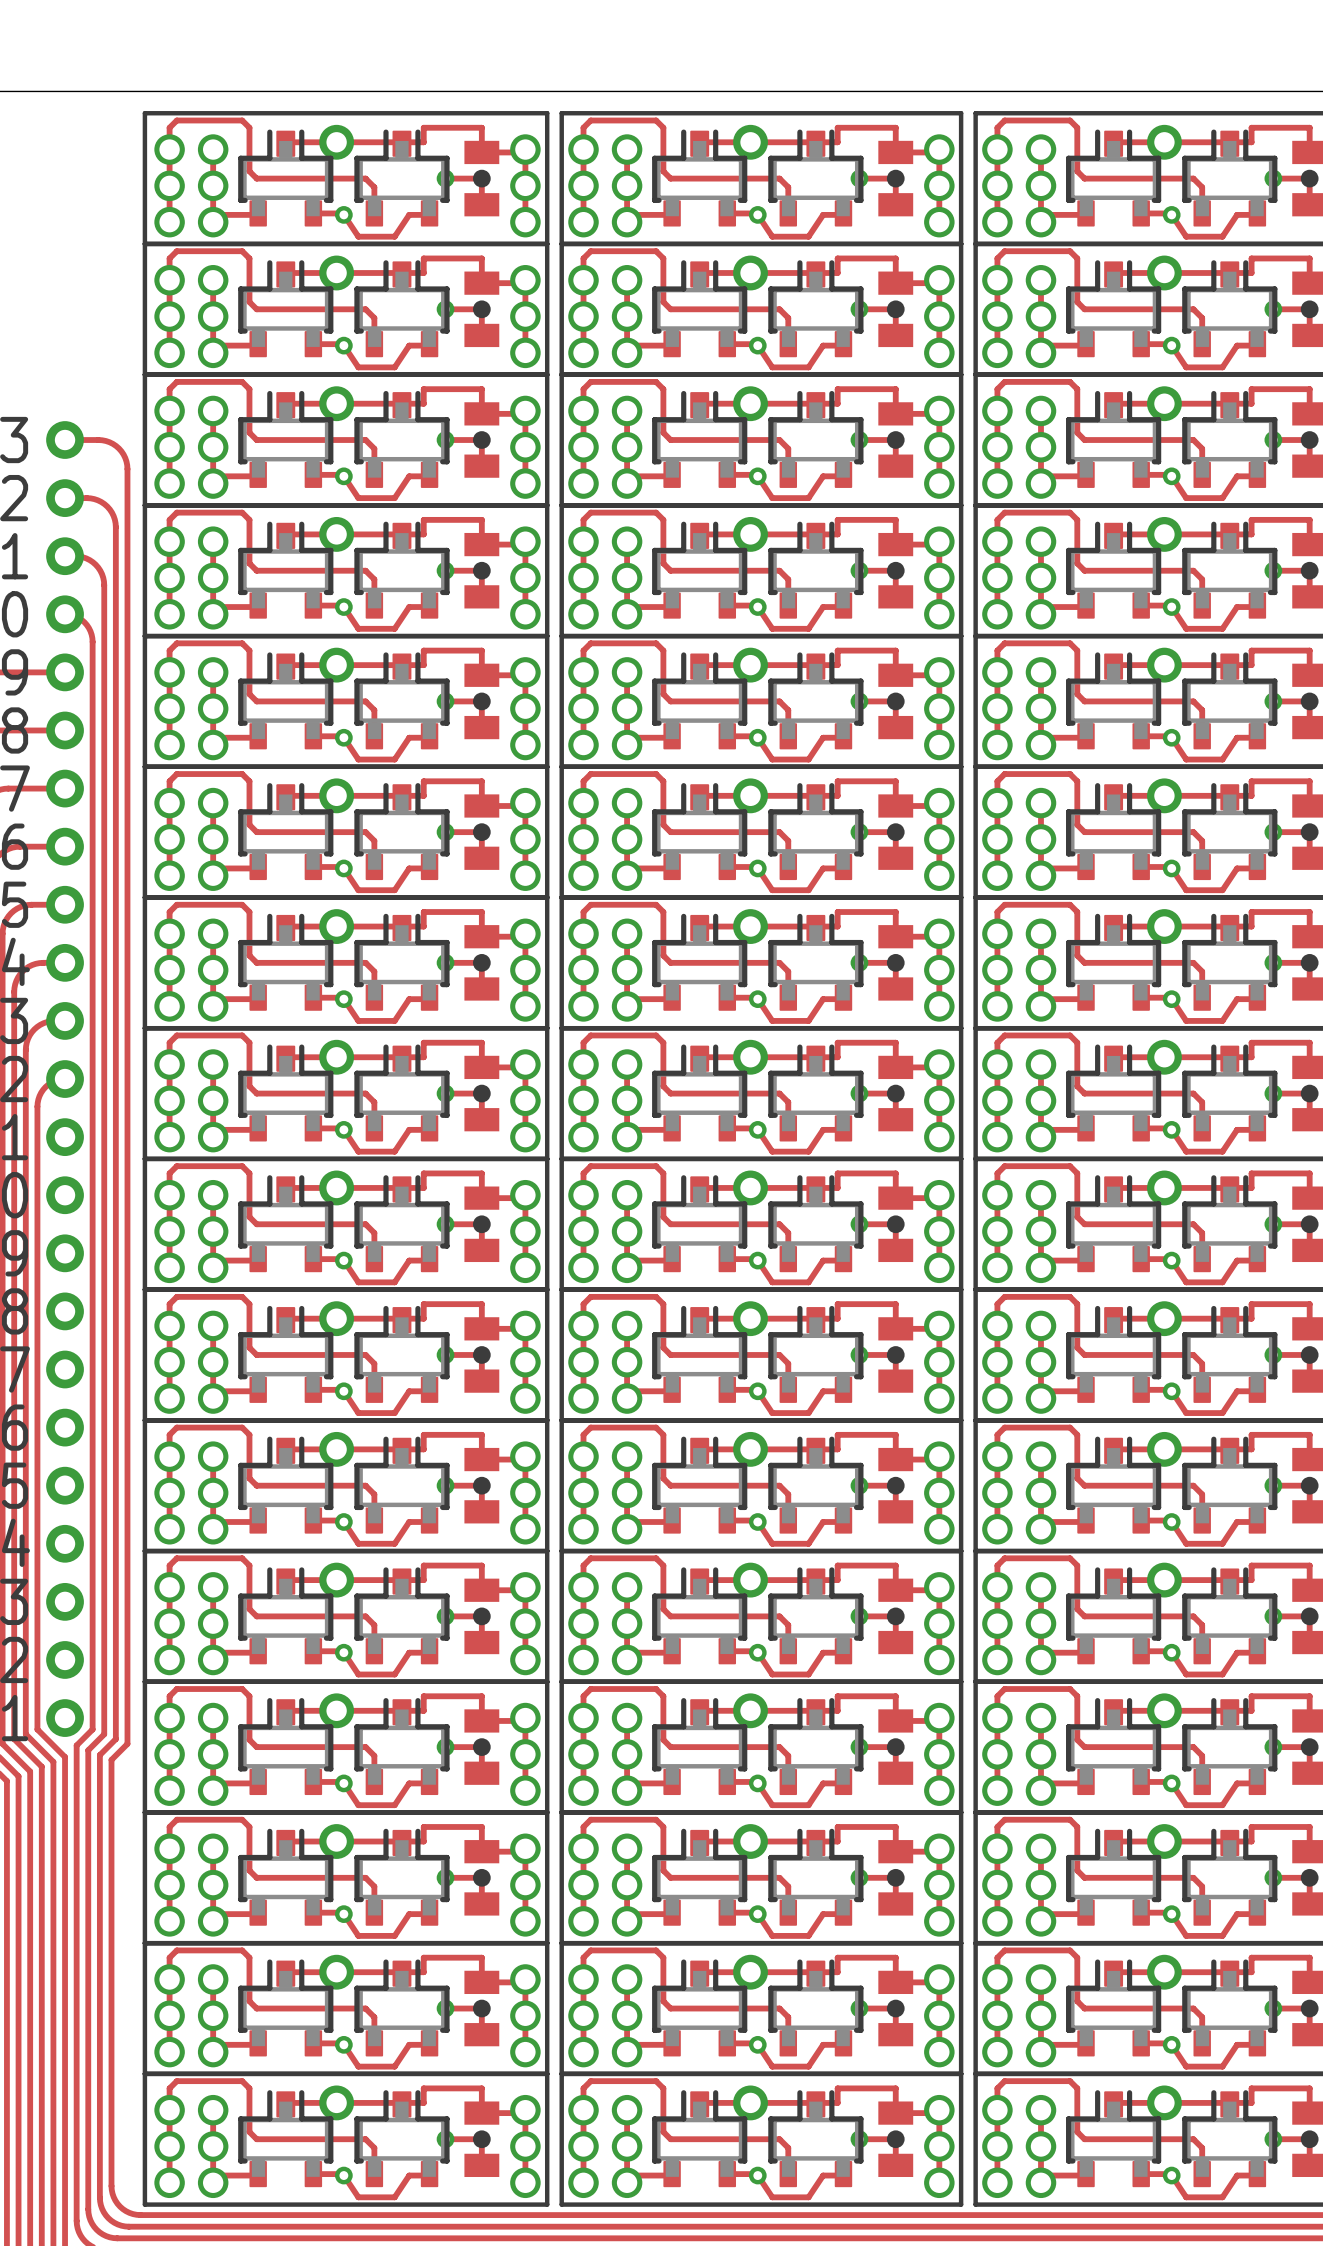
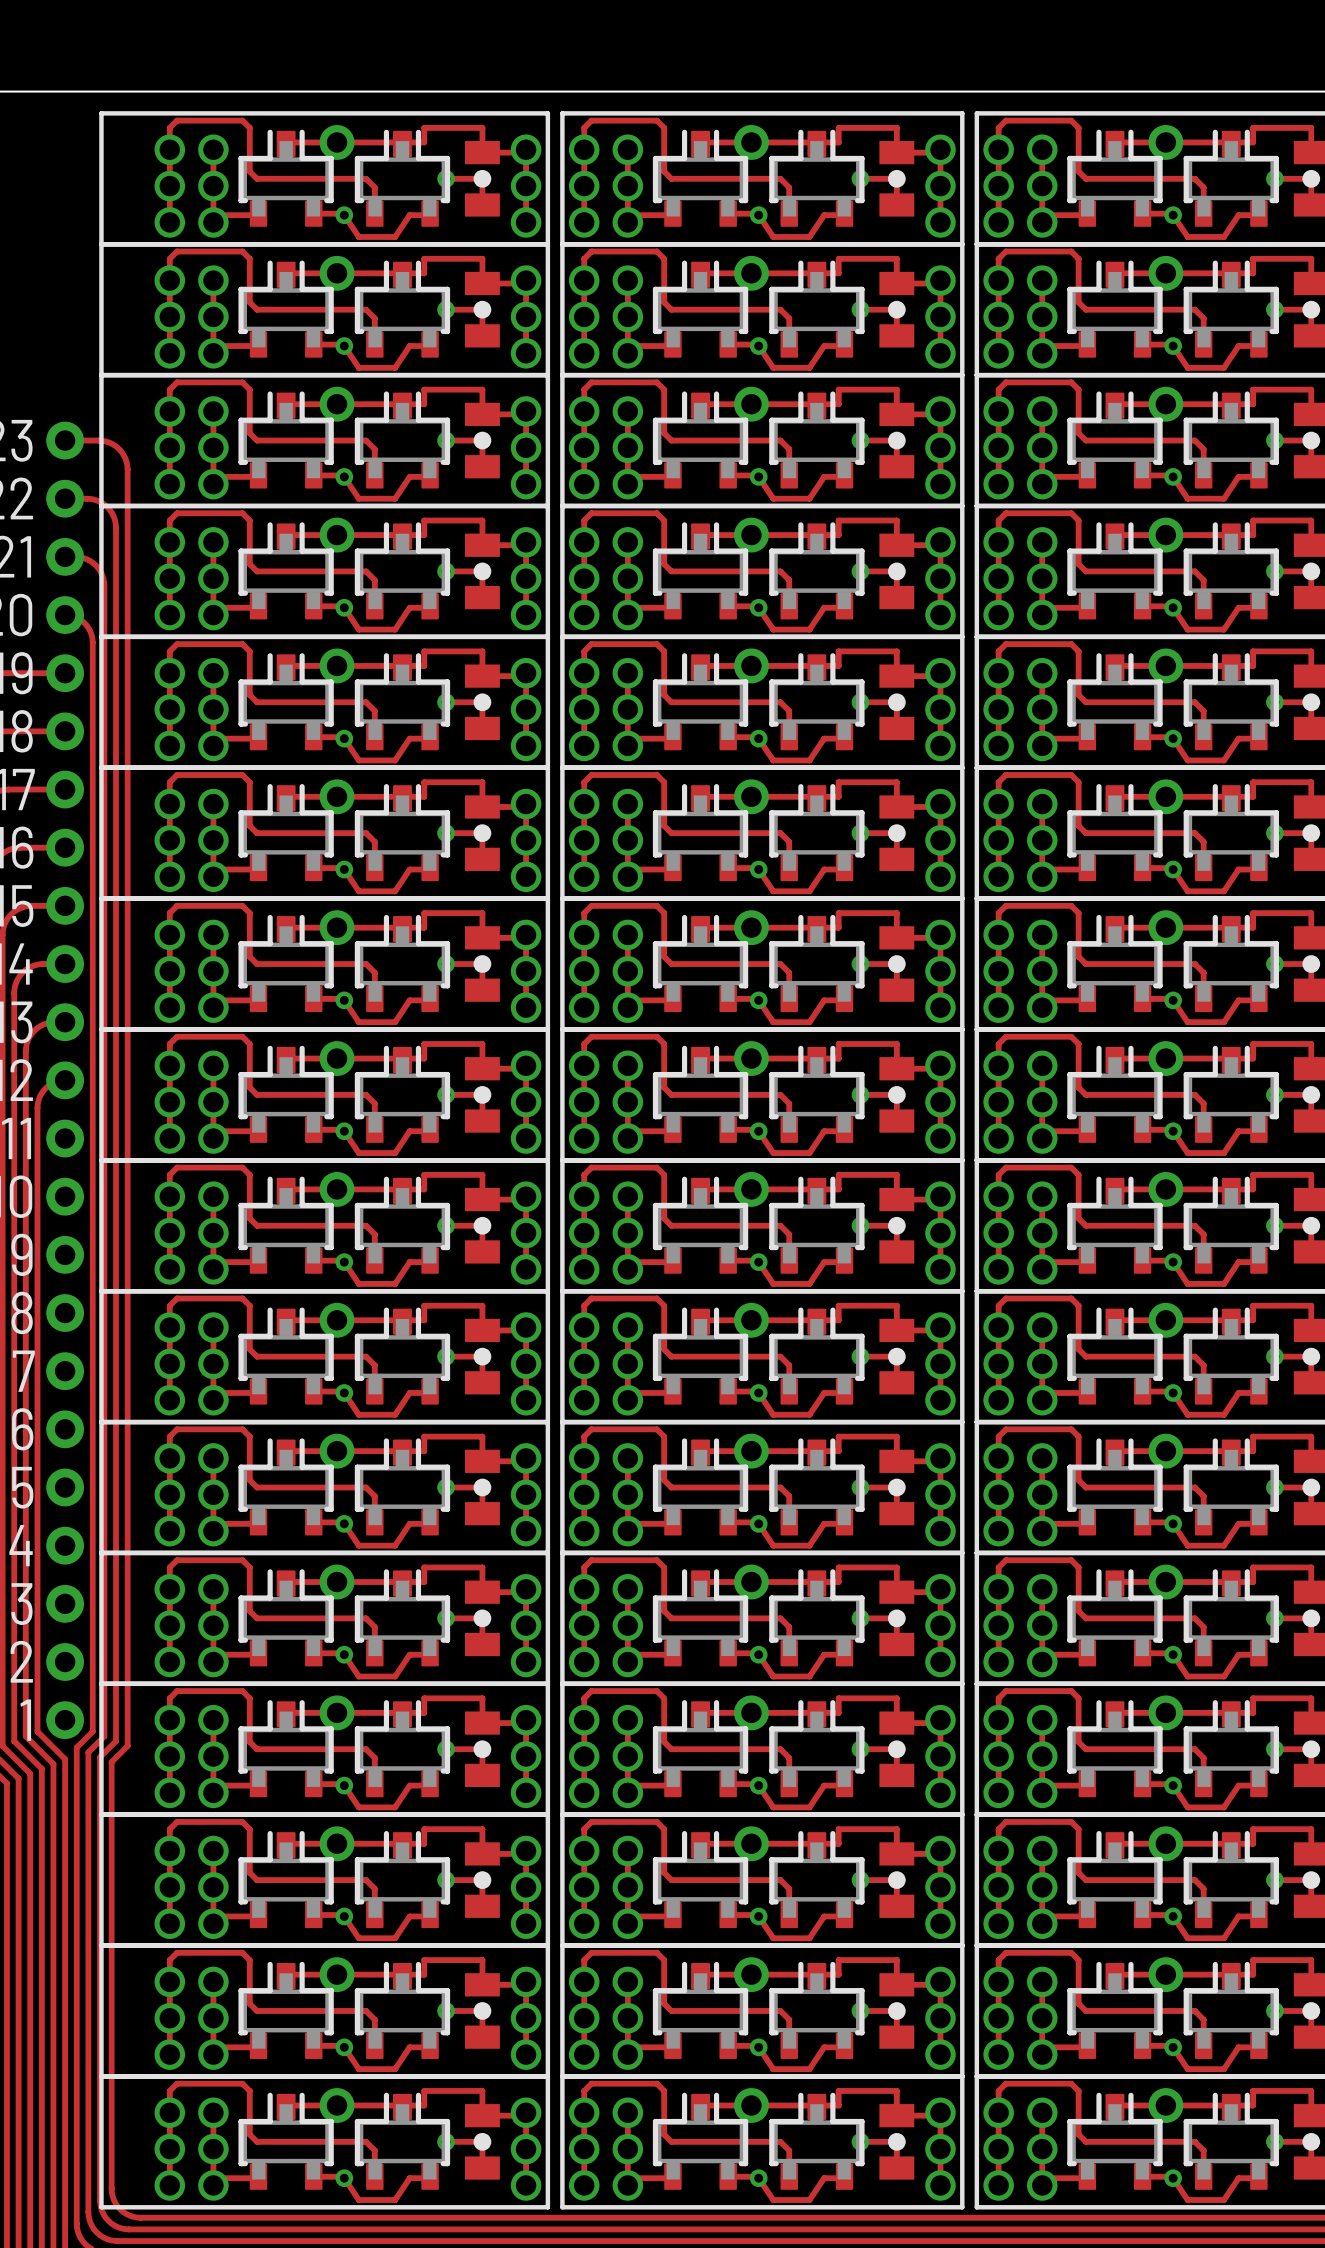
line: (144, 113) (144, 2204) -> (145, 113) (101, 113) (101, 2207) (145, 2207)
line: none -> (101, 244) (145, 244)
line: none -> (101, 375) (145, 375)
line: none -> (101, 505) (145, 505)
line: none -> (101, 636) (145, 636)
line: none -> (101, 767) (145, 767)
line: none -> (101, 898) (145, 898)
line: none -> (101, 1029) (145, 1029)
line: none -> (101, 1160) (145, 1160)
line: none -> (101, 1291) (145, 1291)
line: none -> (101, 1422) (145, 1422)
line: none -> (101, 1552) (145, 1552)
line: none -> (101, 1683) (145, 1683)
line: none -> (101, 1814) (145, 1814)
line: none -> (101, 1945) (145, 1945)
line: none -> (101, 2076) (145, 2076)

